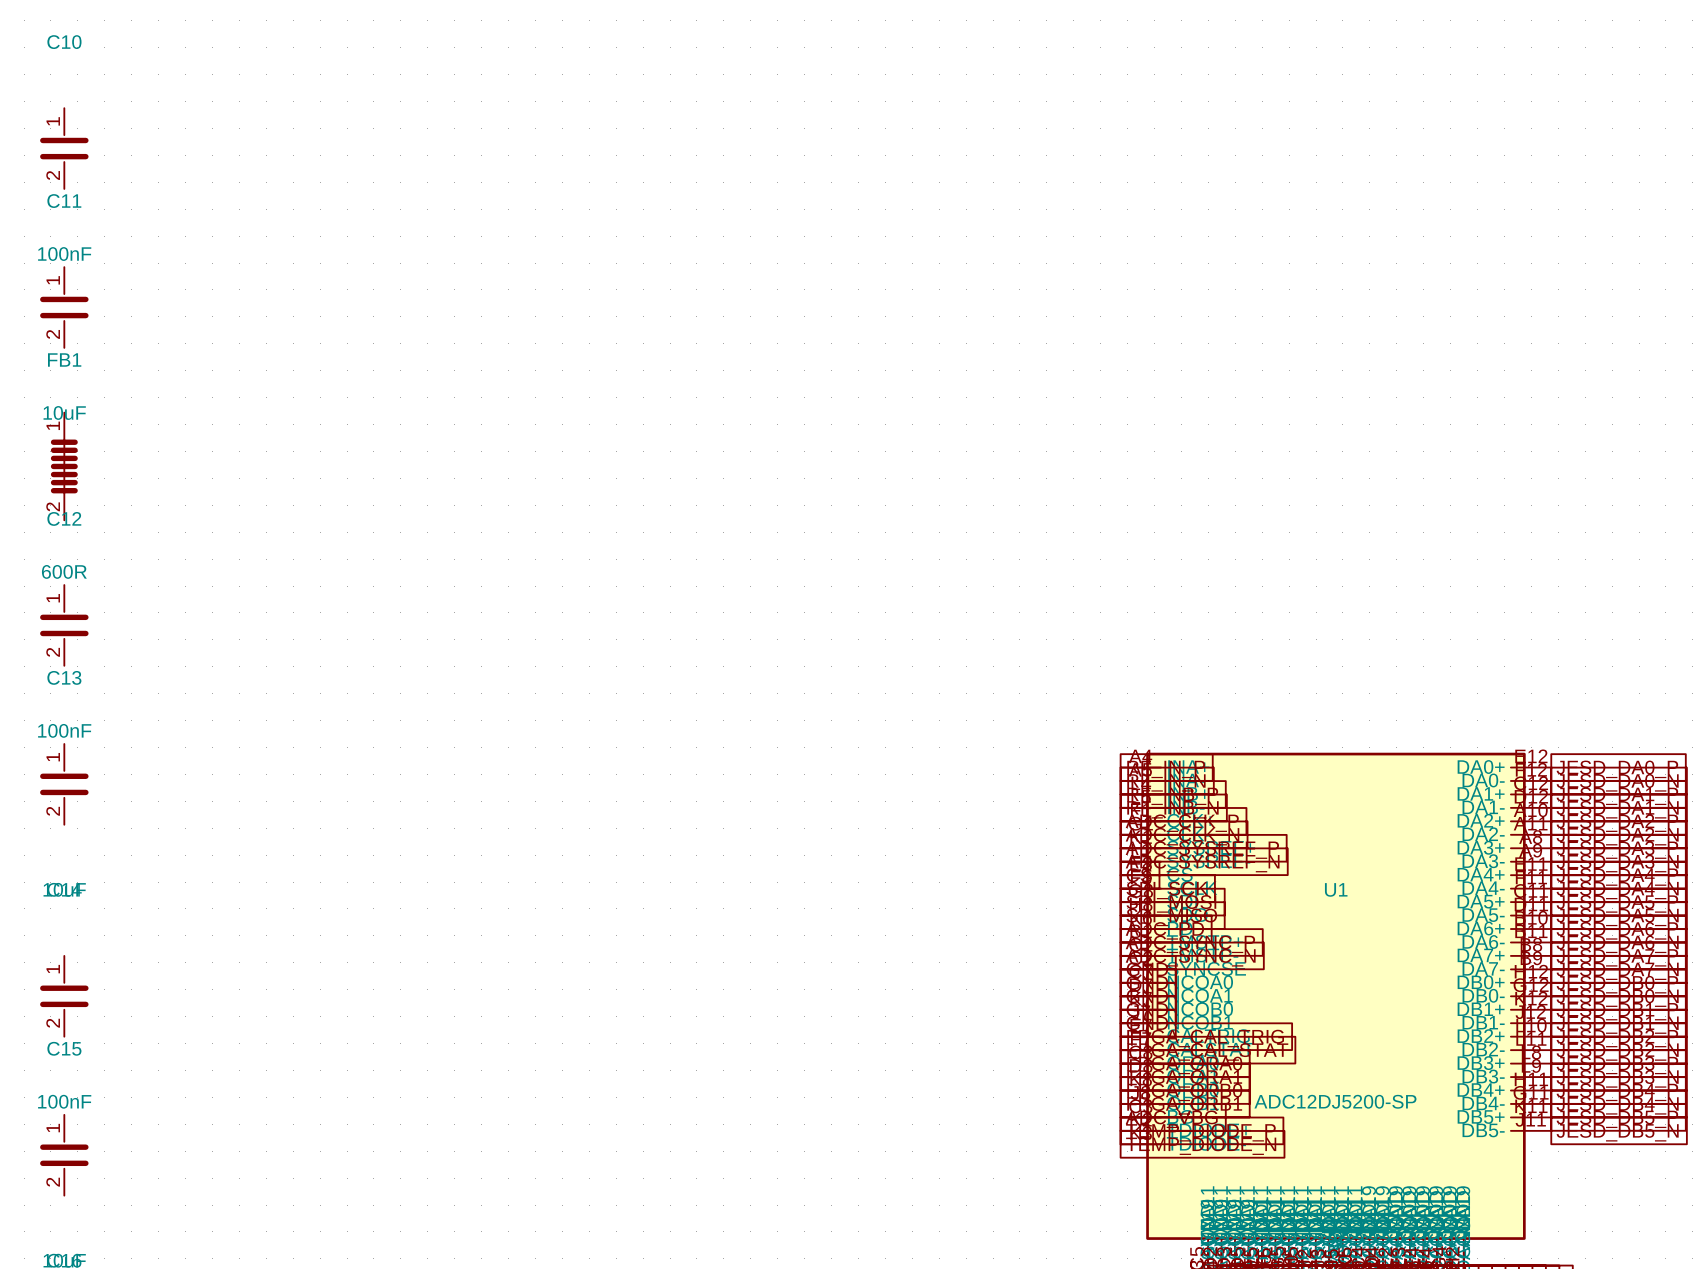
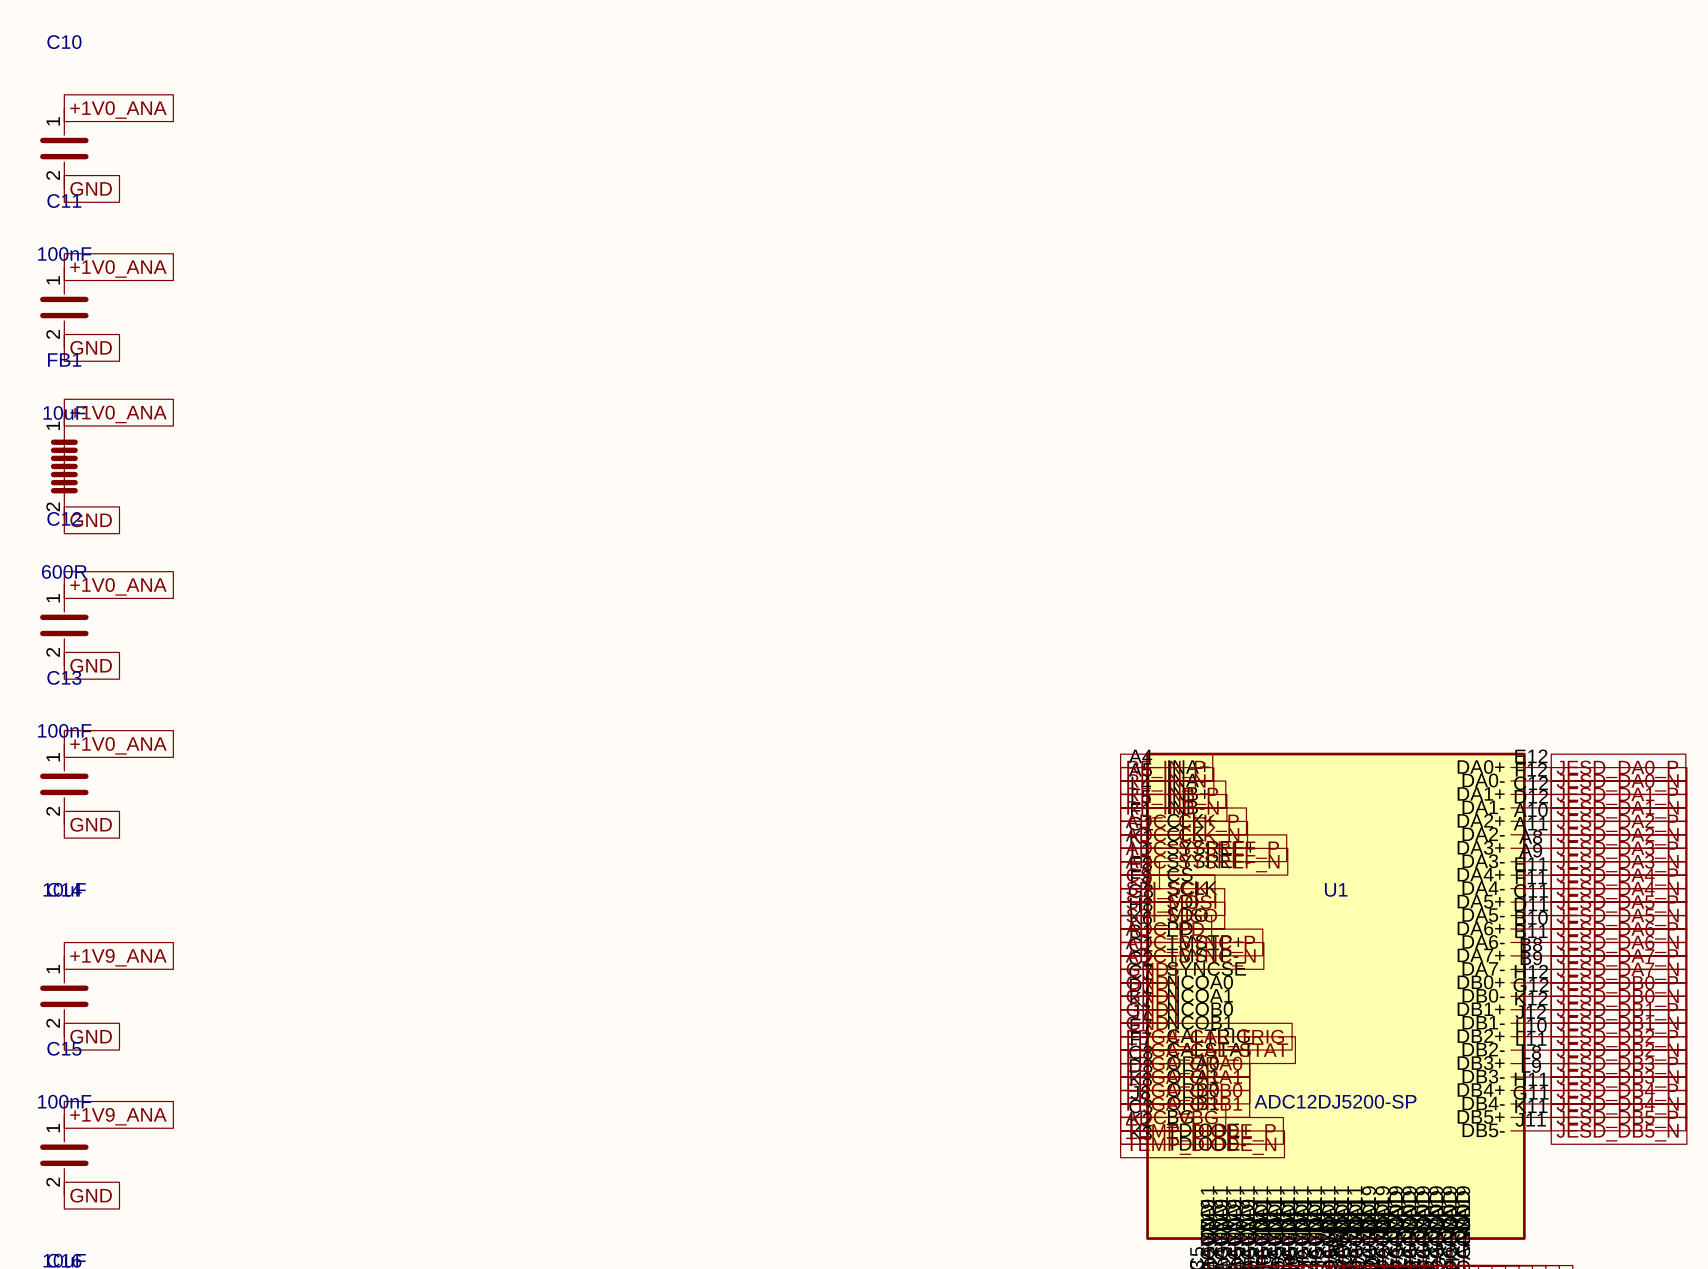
global label: none -> +1V0_ANA (118, 110)
global label: none -> GND (91, 188)
global label: none -> +1V0_ANA (118, 268)
global label: none -> GND (91, 347)
global label: none -> +1V0_ANA (118, 414)
global label: none -> GND (91, 520)
global label: none -> +1V0_ANA (118, 586)
global label: none -> GND (91, 665)
global label: none -> +1V0_ANA (118, 745)
global label: none -> GND (91, 824)
global label: none -> +1V9_ANA (118, 957)
global label: none -> GND (91, 1036)
global label: none -> +1V9_ANA (118, 1116)
global label: none -> GND (91, 1195)

